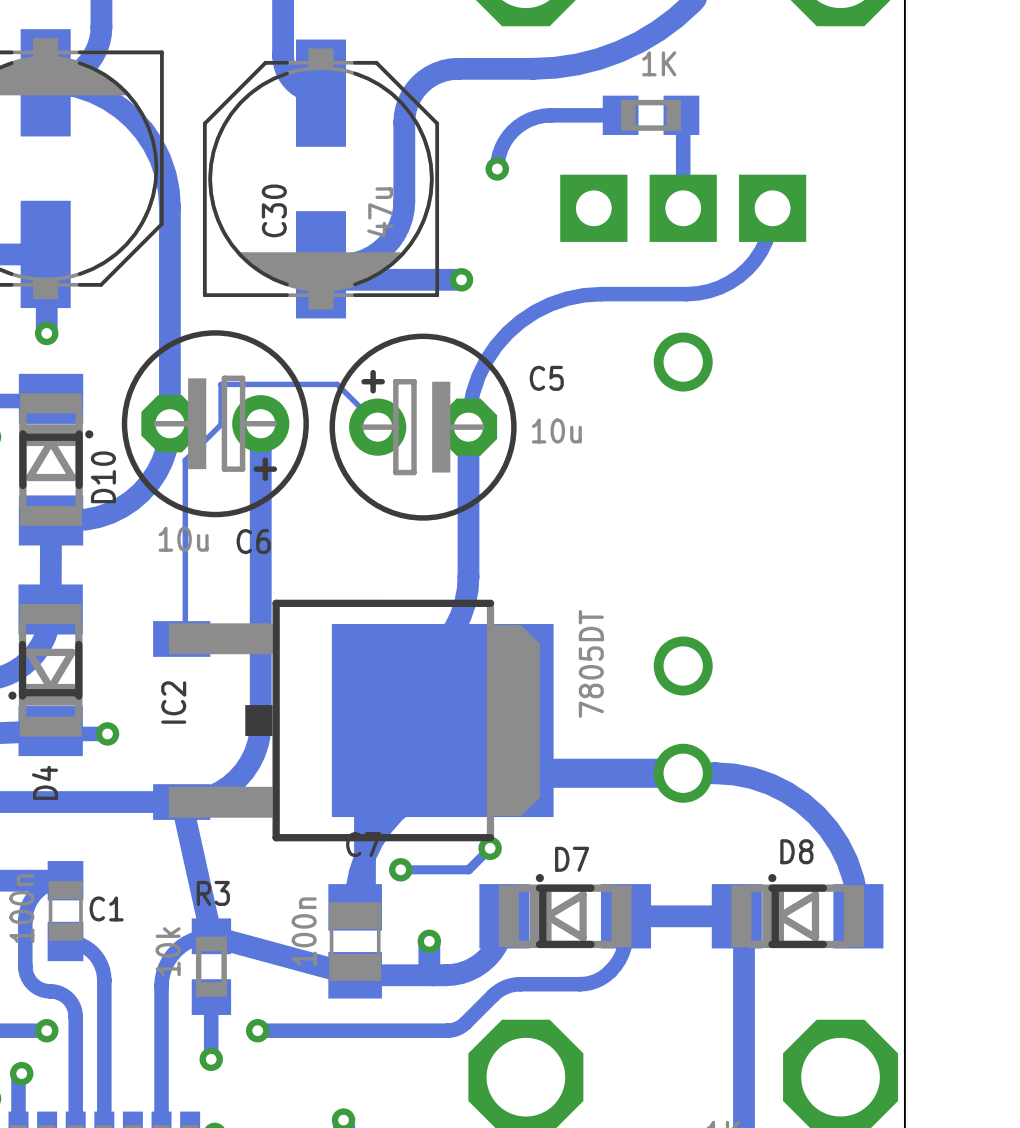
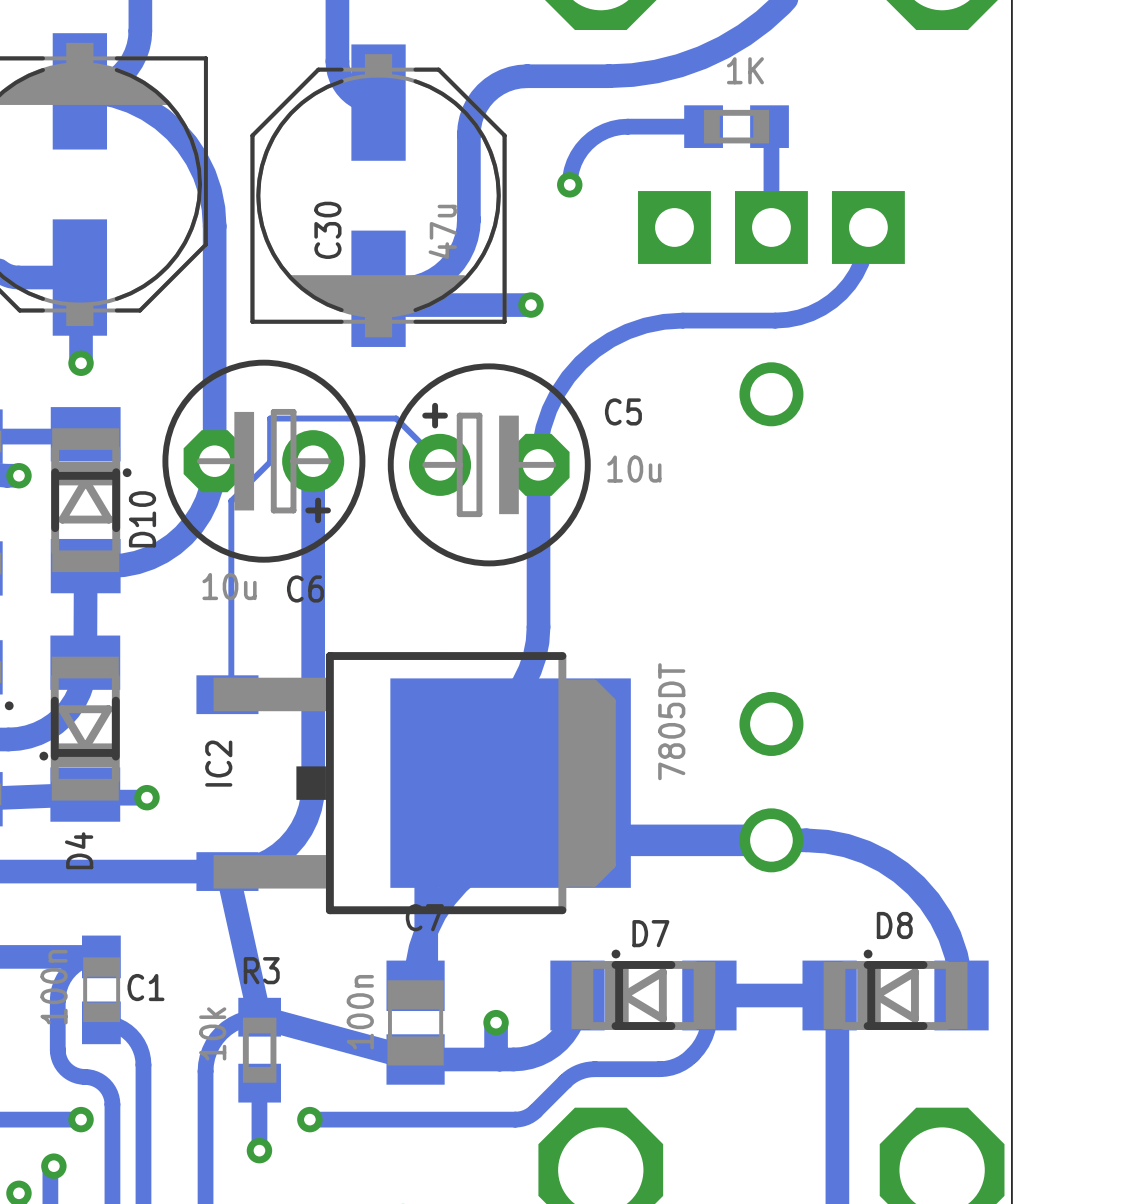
track: (490, 848) (468, 869) (400, 869) -> none
via: (490, 848) -> none
via: (400, 869) -> none

